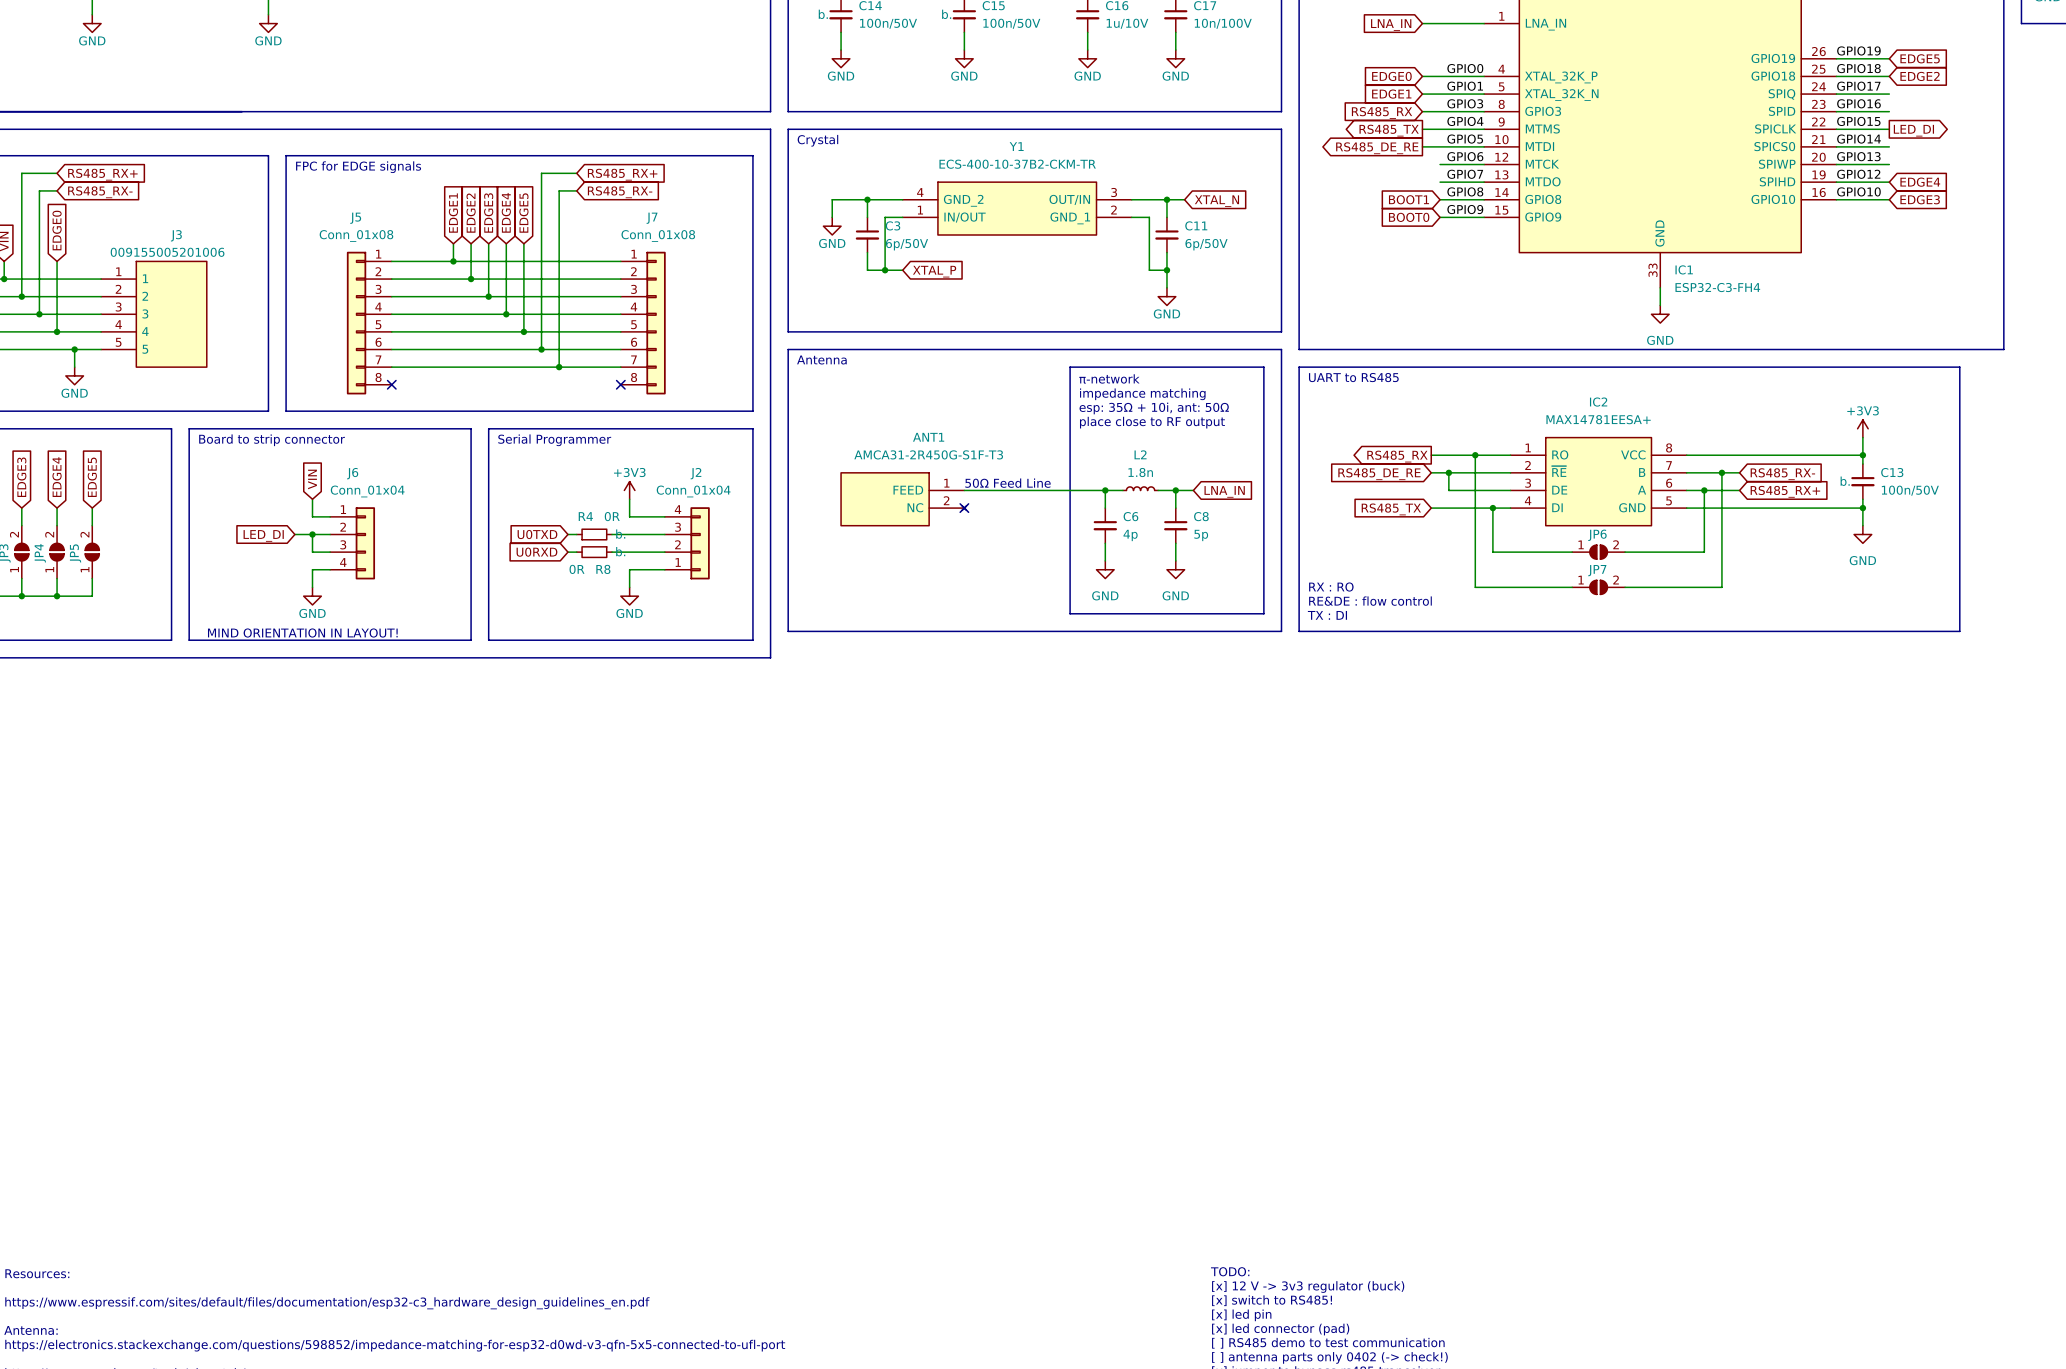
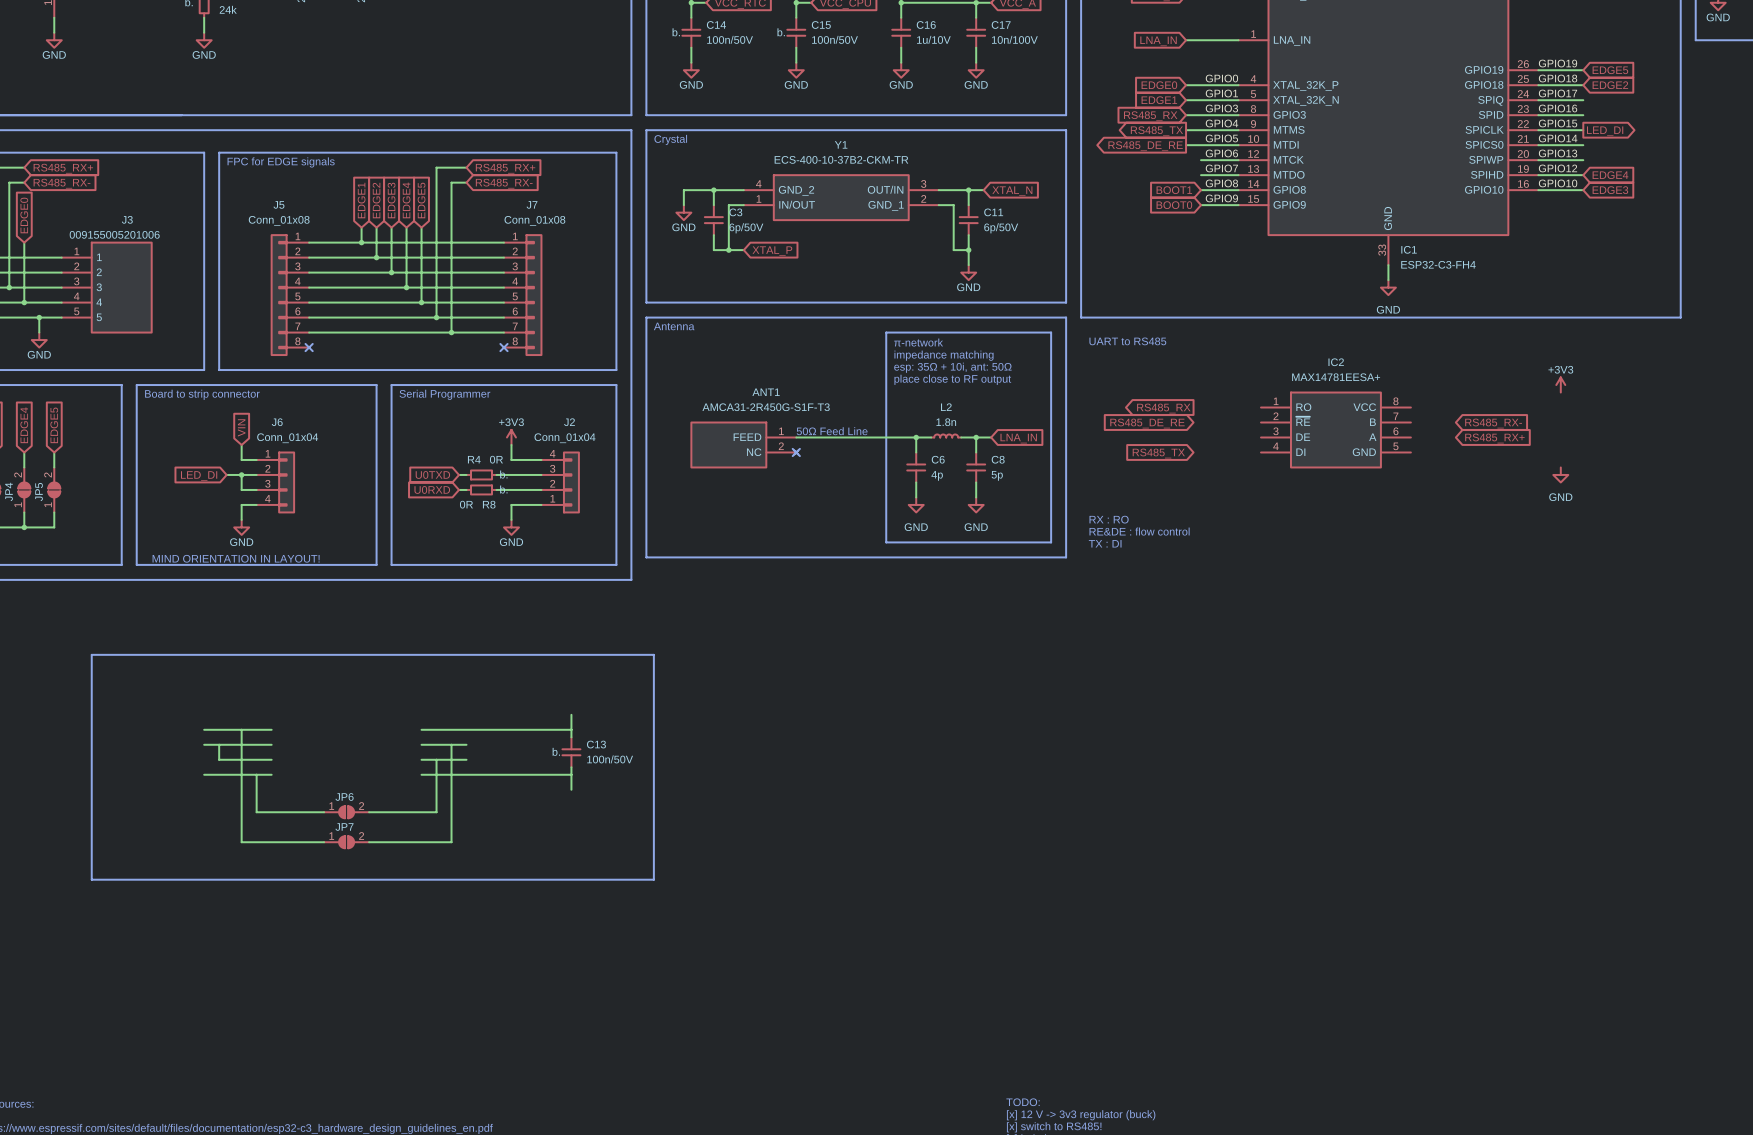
line: (1299, 367) (1299, 631) (1959, 631) (1959, 367) (1299, 367) -> none
wire: (1862, 437) (1862, 464) -> none
wire: (1431, 455) (1510, 455) -> none
wire: (1475, 455) (1475, 587) (1572, 587) -> none
junction: (1475, 455) -> none
wire: (1686, 455) (1862, 455) -> none
junction: (1862, 455) -> none
wire: (1431, 472) (1510, 472) -> none
wire: (1448, 472) (1448, 490) (1510, 490) -> none
junction: (1448, 472) -> none
wire: (1686, 472) (1739, 472) -> none
wire: (1721, 472) (1721, 587) (1625, 587) -> none
junction: (1721, 472) -> none
C13 position: (1862, 481) -> (571, 752)
wire: (1686, 490) (1739, 490) -> none
wire: (1704, 490) (1704, 552) (1625, 552) -> none
junction: (1704, 490) -> none
wire: (1862, 499) (1862, 525) -> none
wire: (1431, 508) (1510, 508) -> none
wire: (1492, 508) (1492, 552) (1572, 552) -> none
junction: (1492, 508) -> none
wire: (1686, 508) (1862, 508) -> none
junction: (1862, 508) -> none
JP6 position: (1598, 552) -> (346, 812)
JP7 position: (1598, 587) -> (346, 842)
line: none -> (91, 654) (91, 879) (653, 879) (653, 654) (91, 654)
wire: none -> (571, 714) (571, 737)
wire: none -> (204, 729) (271, 729)
wire: none -> (241, 729) (241, 842) (324, 842)
wire: none -> (421, 729) (571, 729)
wire: none -> (204, 744) (271, 744)
wire: none -> (219, 744) (219, 759) (271, 759)
wire: none -> (421, 744) (466, 744)
wire: none -> (451, 744) (451, 842) (369, 842)
wire: none -> (421, 759) (466, 759)
wire: none -> (436, 759) (436, 812) (369, 812)
wire: none -> (571, 767) (571, 789)
wire: none -> (204, 774) (271, 774)
wire: none -> (256, 774) (256, 812) (324, 812)
wire: none -> (421, 774) (571, 774)

